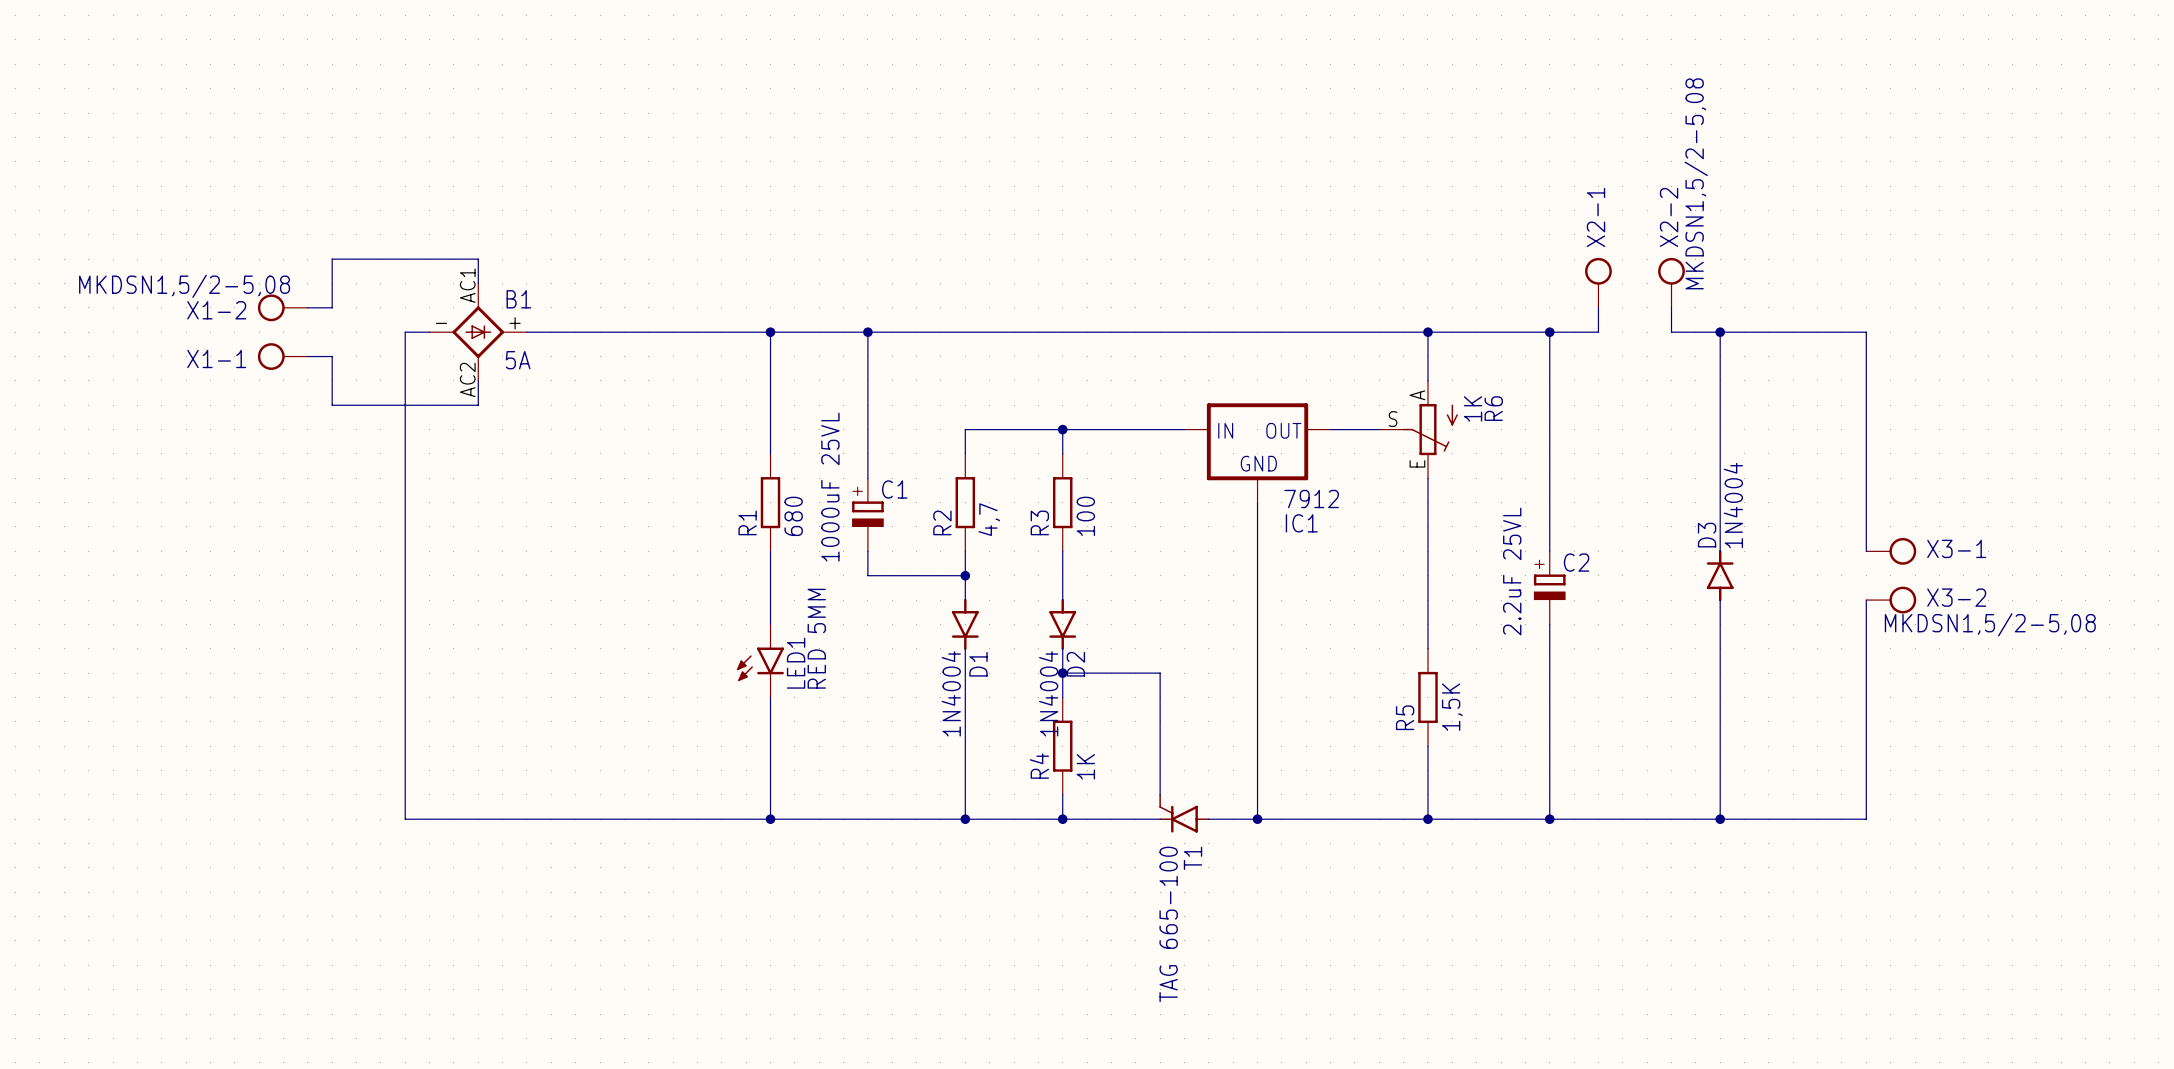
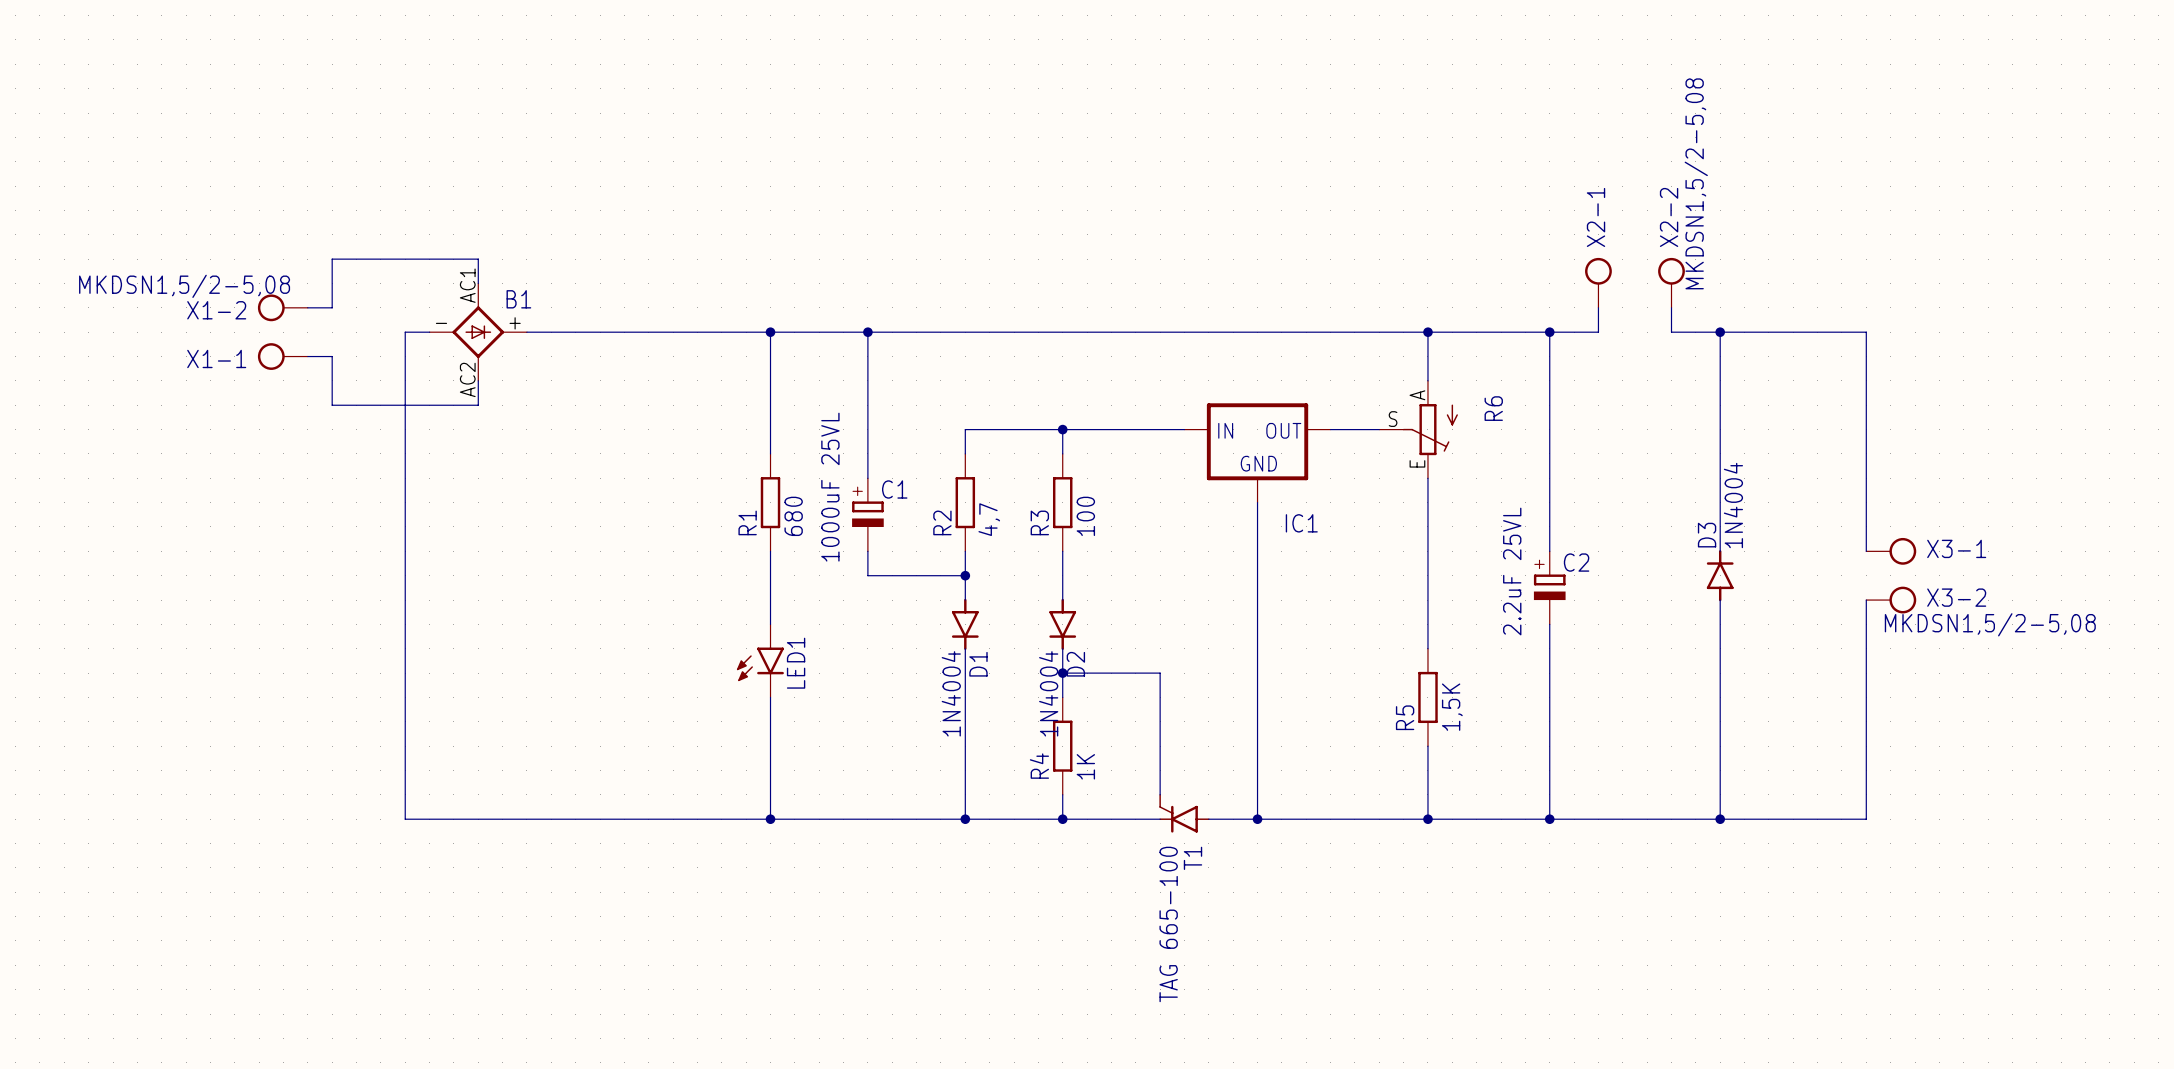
B1 value: 5A (518, 360) -> none
R6 value: 1K (1473, 408) -> none
IC1 value: 7912 (1311, 498) -> none
LED1 value: RED 5MM (816, 638) -> none

